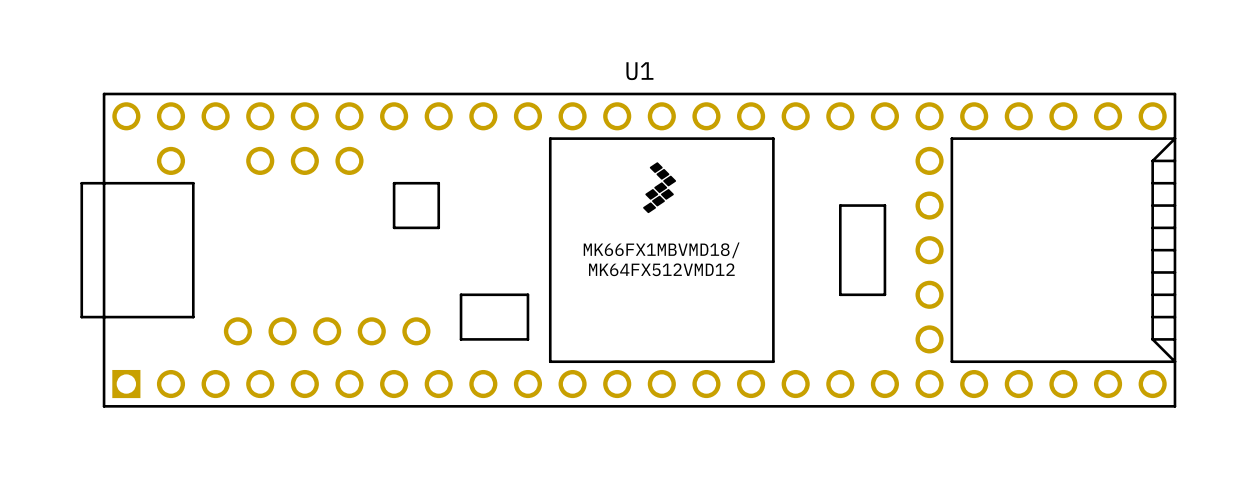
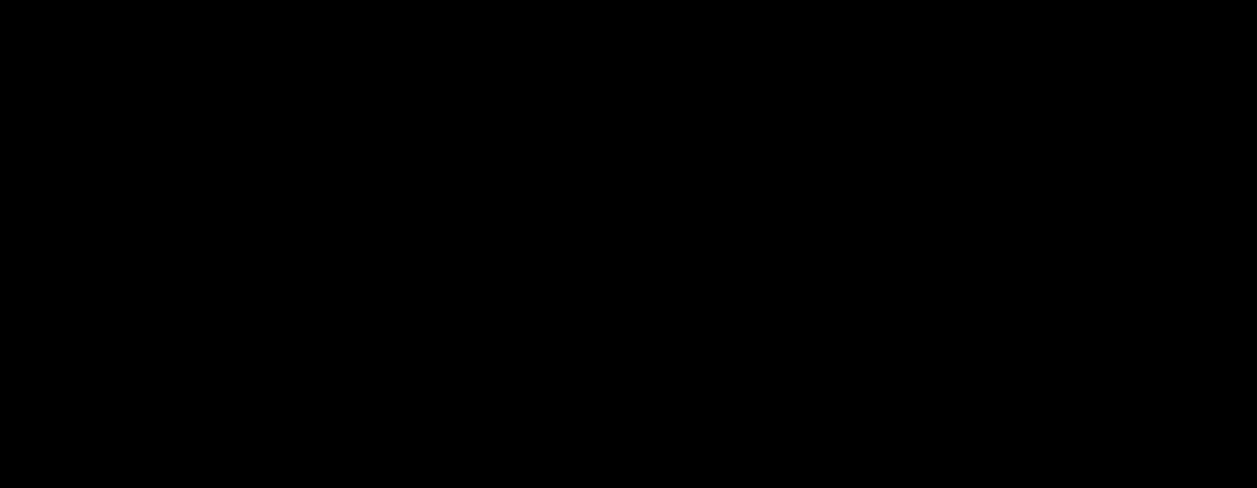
U1: (628, 250) -> none

